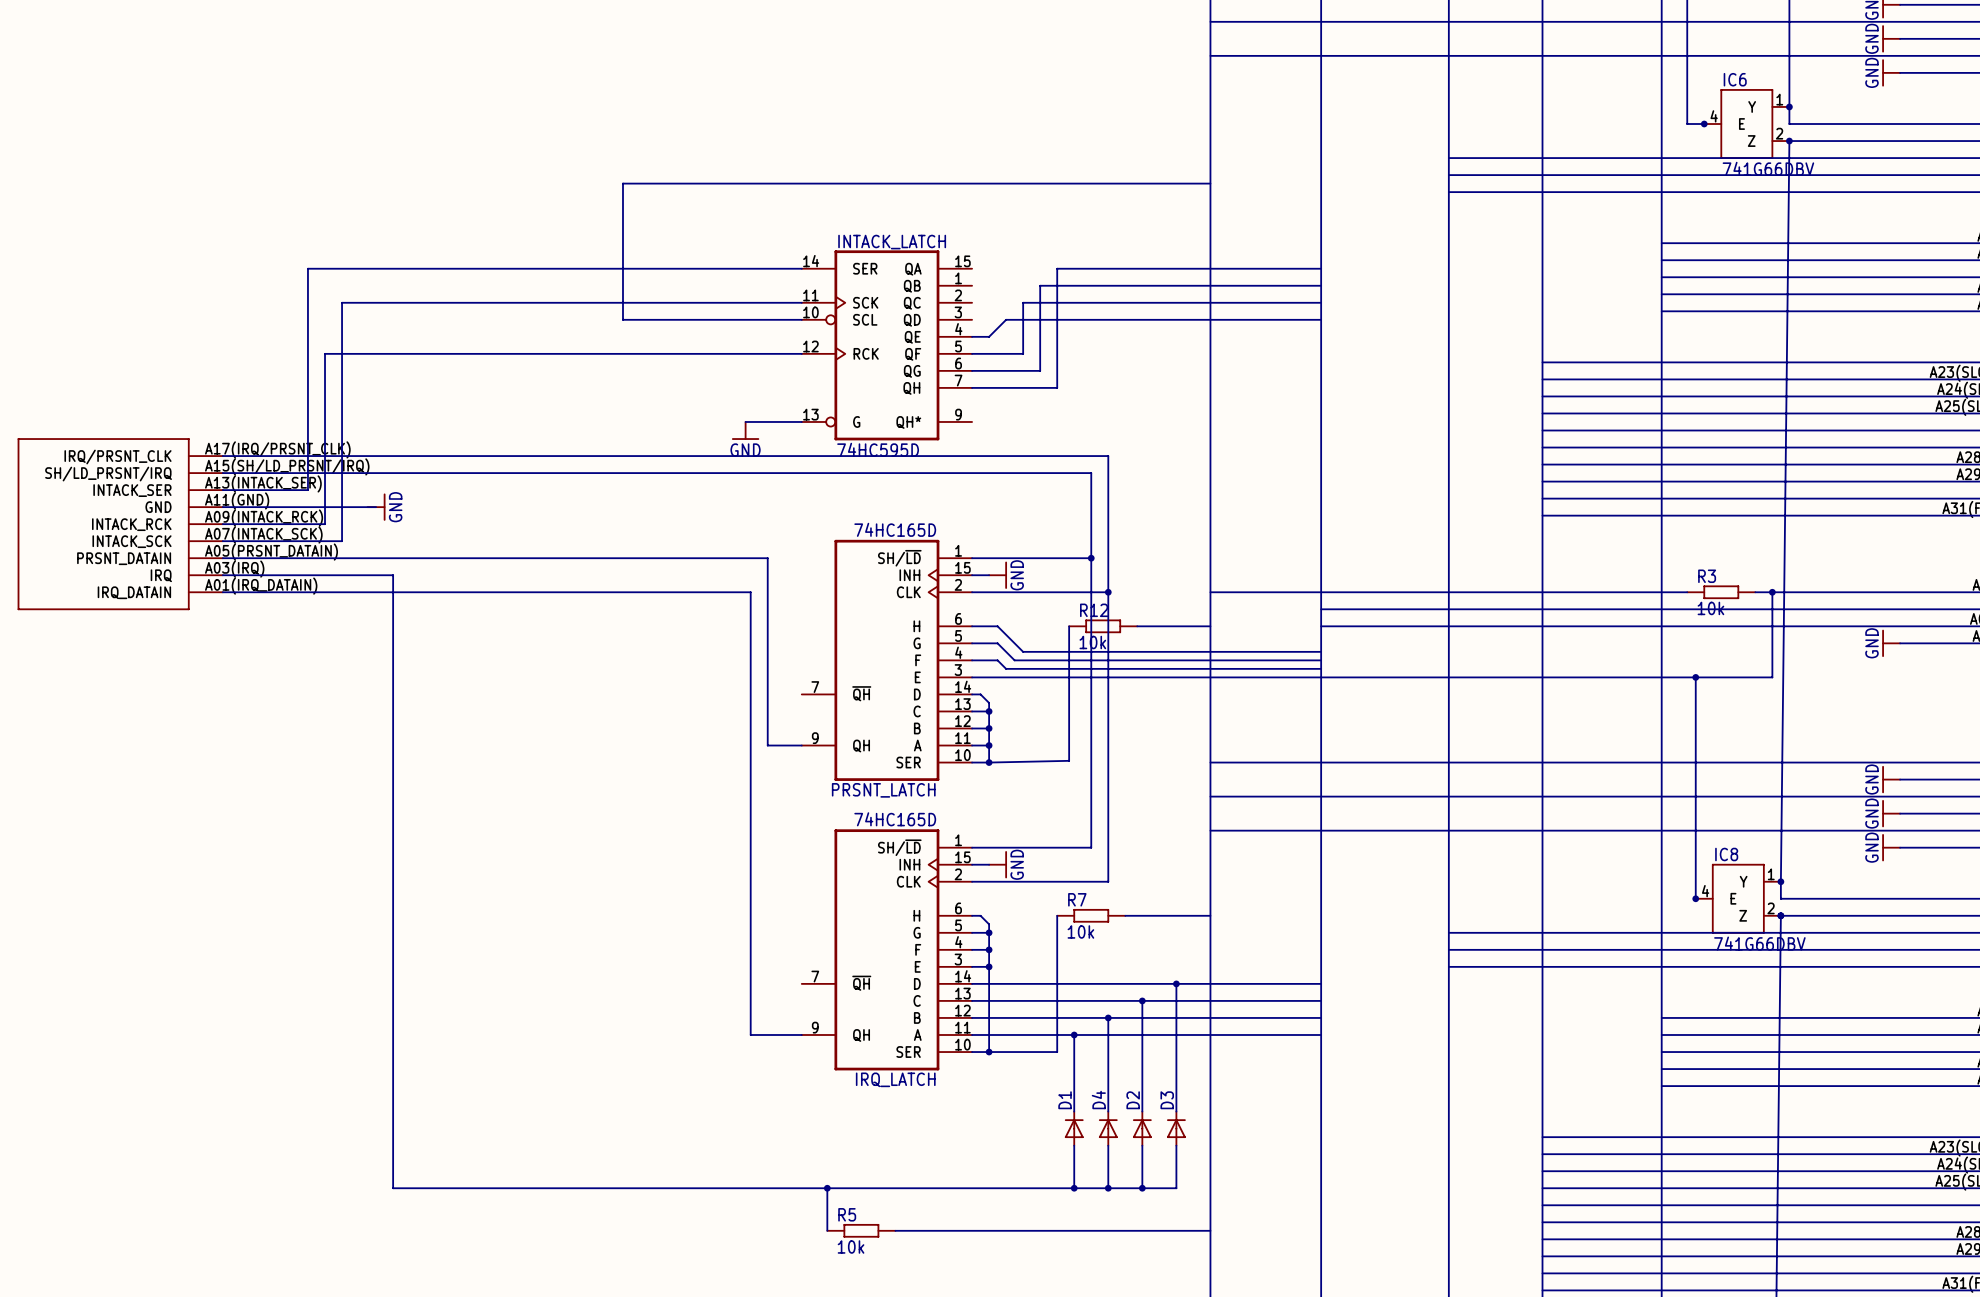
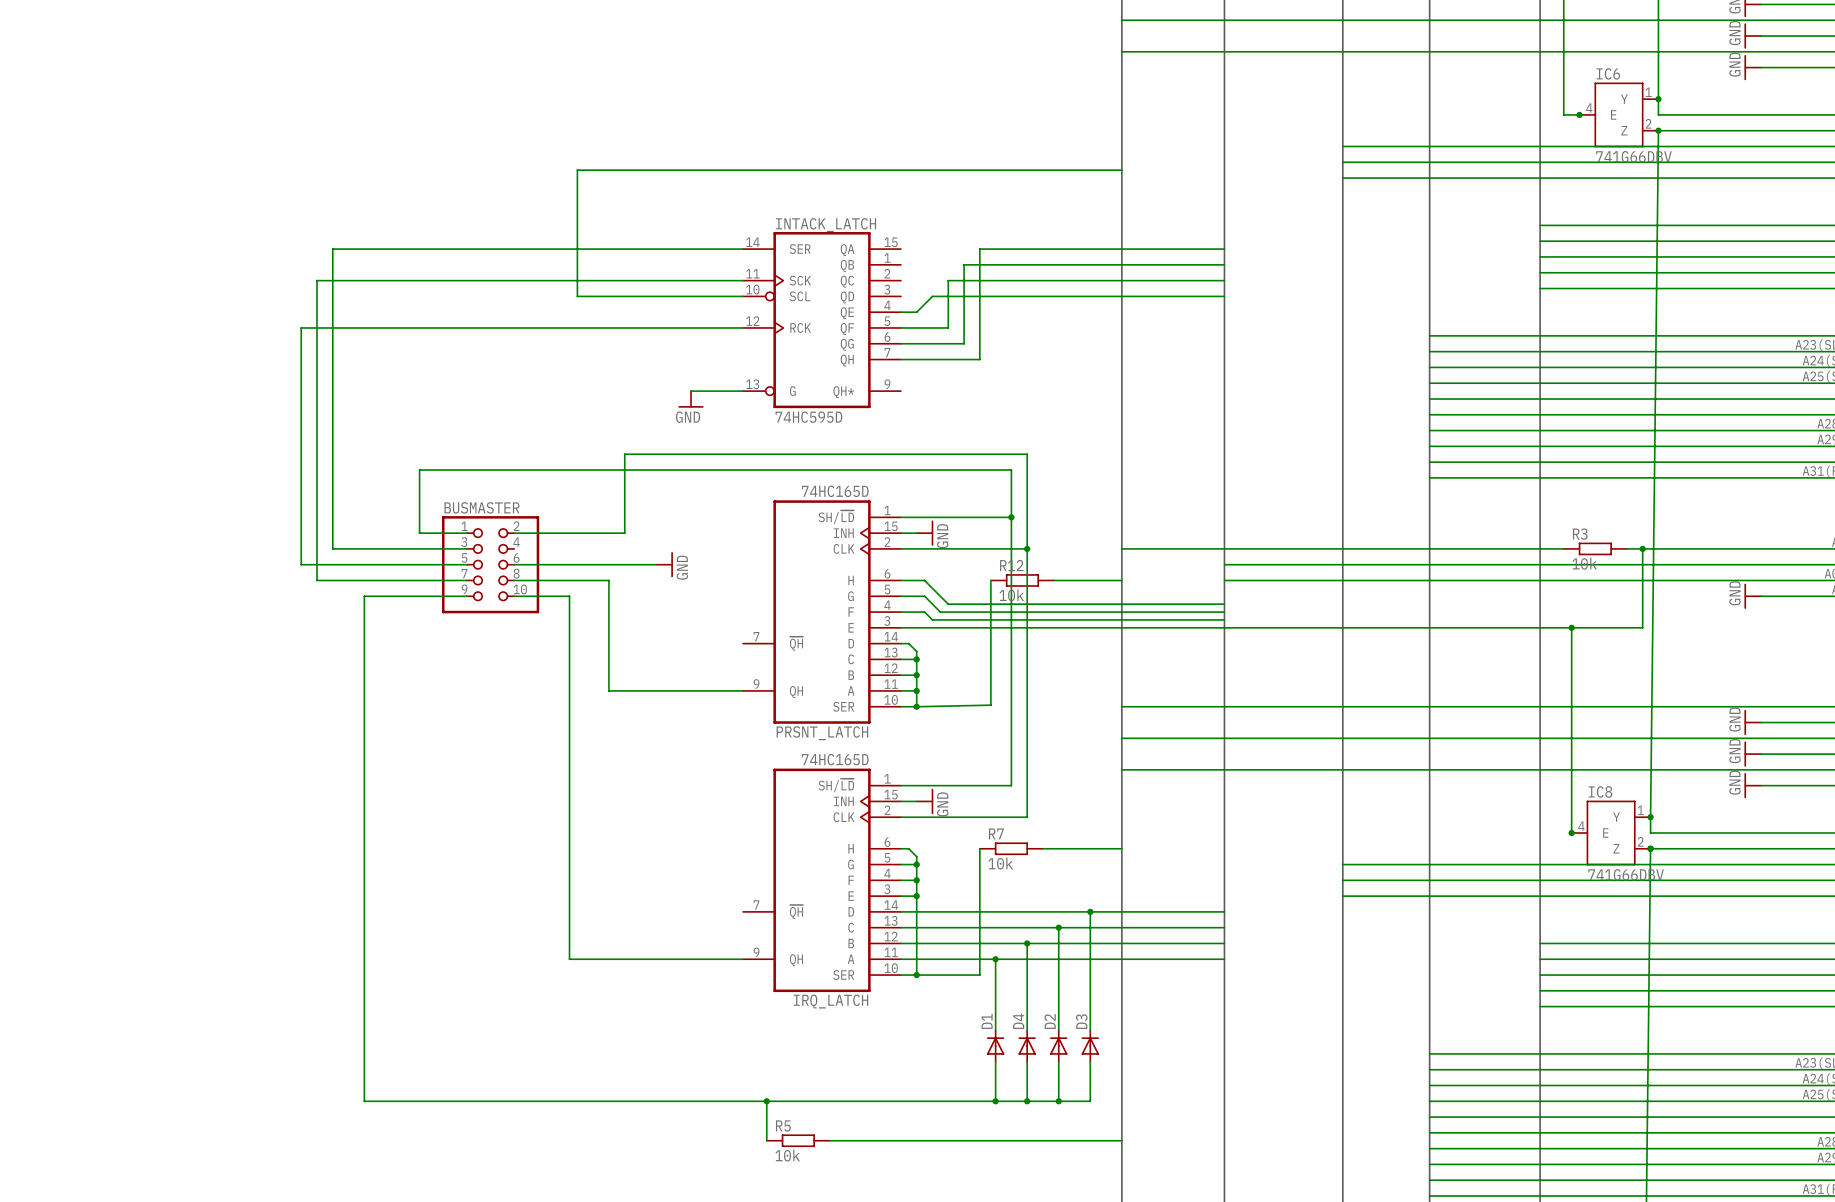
wire: (359, 268) (307, 268) (307, 490) (222, 490) -> (332, 249) (332, 548)
wire: (222, 456) (1108, 456) (1108, 490) -> (514, 533) (624, 533) (624, 454) (1027, 454)
wire: (222, 473) (1091, 473) (1091, 507) -> (466, 533) (419, 533) (419, 470) (1011, 470)
wire: (222, 507) (376, 507) -> none
power symbol: GND (376, 507) -> none
part: (120, 524) -> none
wire: (222, 524) (325, 524) -> (466, 564) (301, 564) (301, 485)
wire: (222, 541) (342, 541) -> (466, 580) (317, 580) (317, 501)
wire: (222, 558) (767, 558) (767, 745) -> (514, 580) (608, 580) (608, 690) (711, 690)
wire: (222, 575) (393, 575) (393, 643) -> (466, 596) (364, 596)
wire: (222, 592) (359, 592) -> none
wire: (503, 592) (750, 592) (750, 1034) -> (514, 596) (569, 596) (569, 959) (695, 959)
BUSMASTER: none -> (490, 564)
wire: none -> (514, 564) (656, 564)
power symbol: none -> GND (664, 564)

